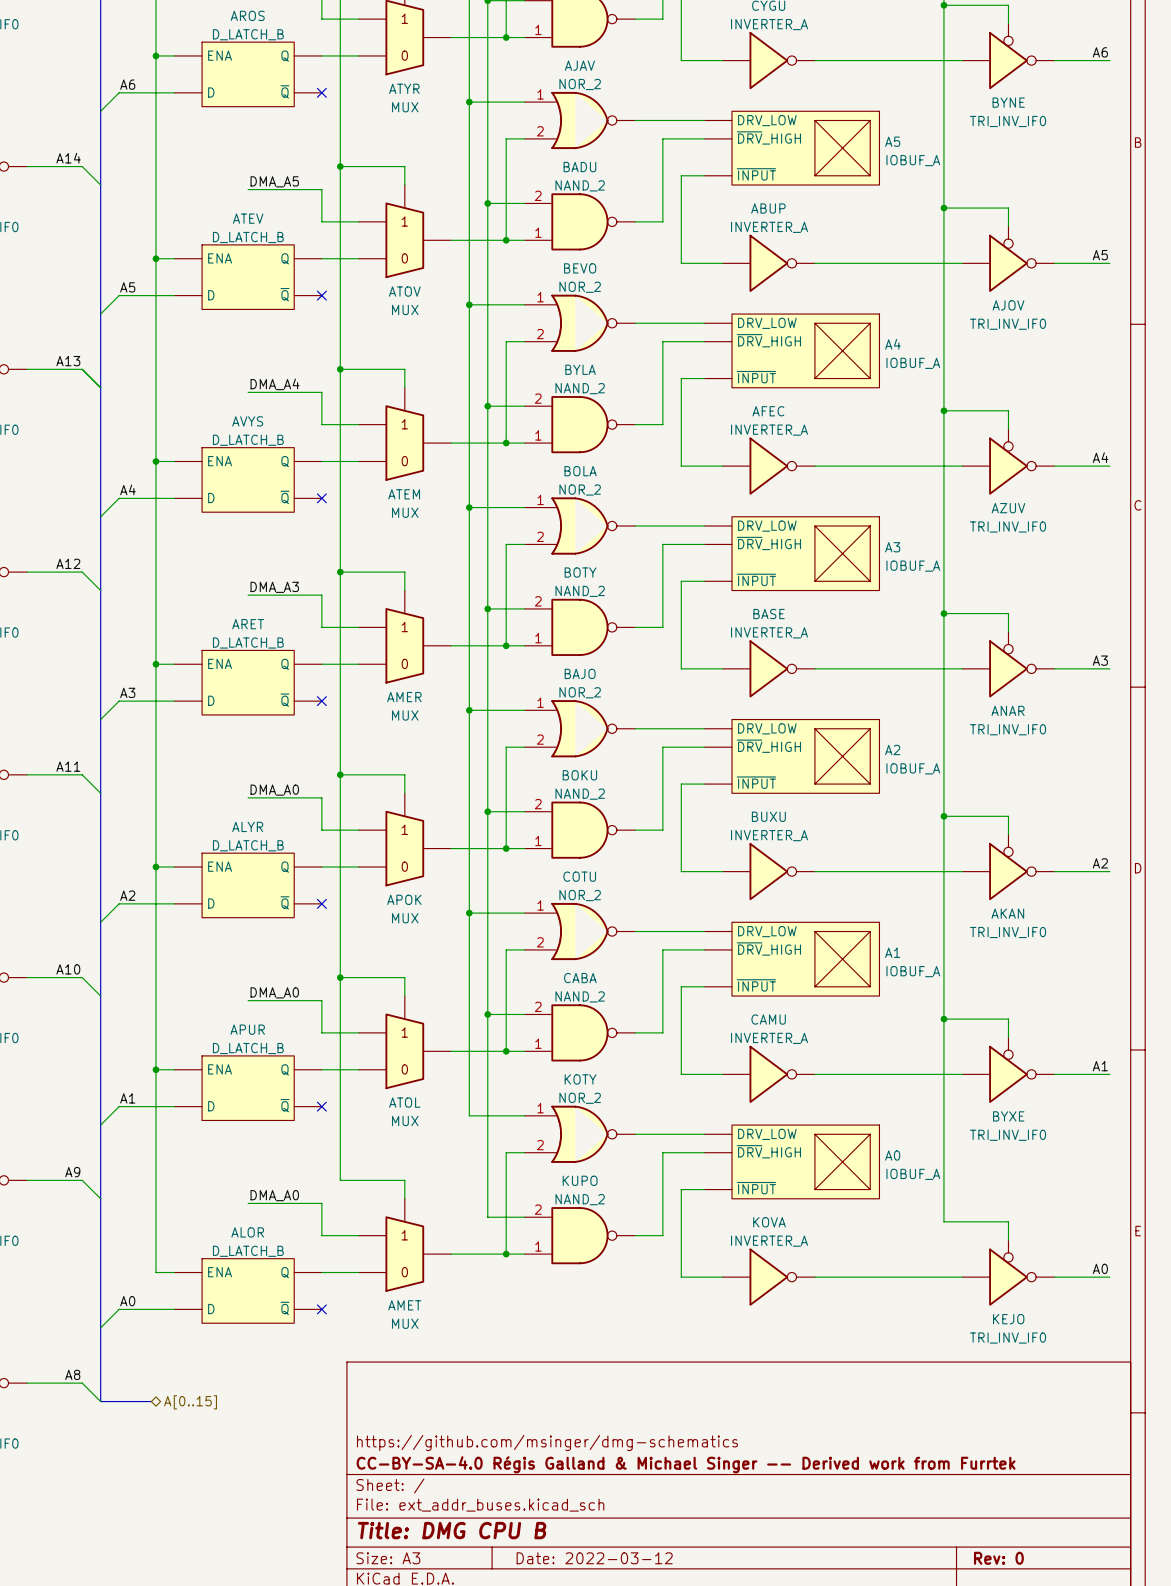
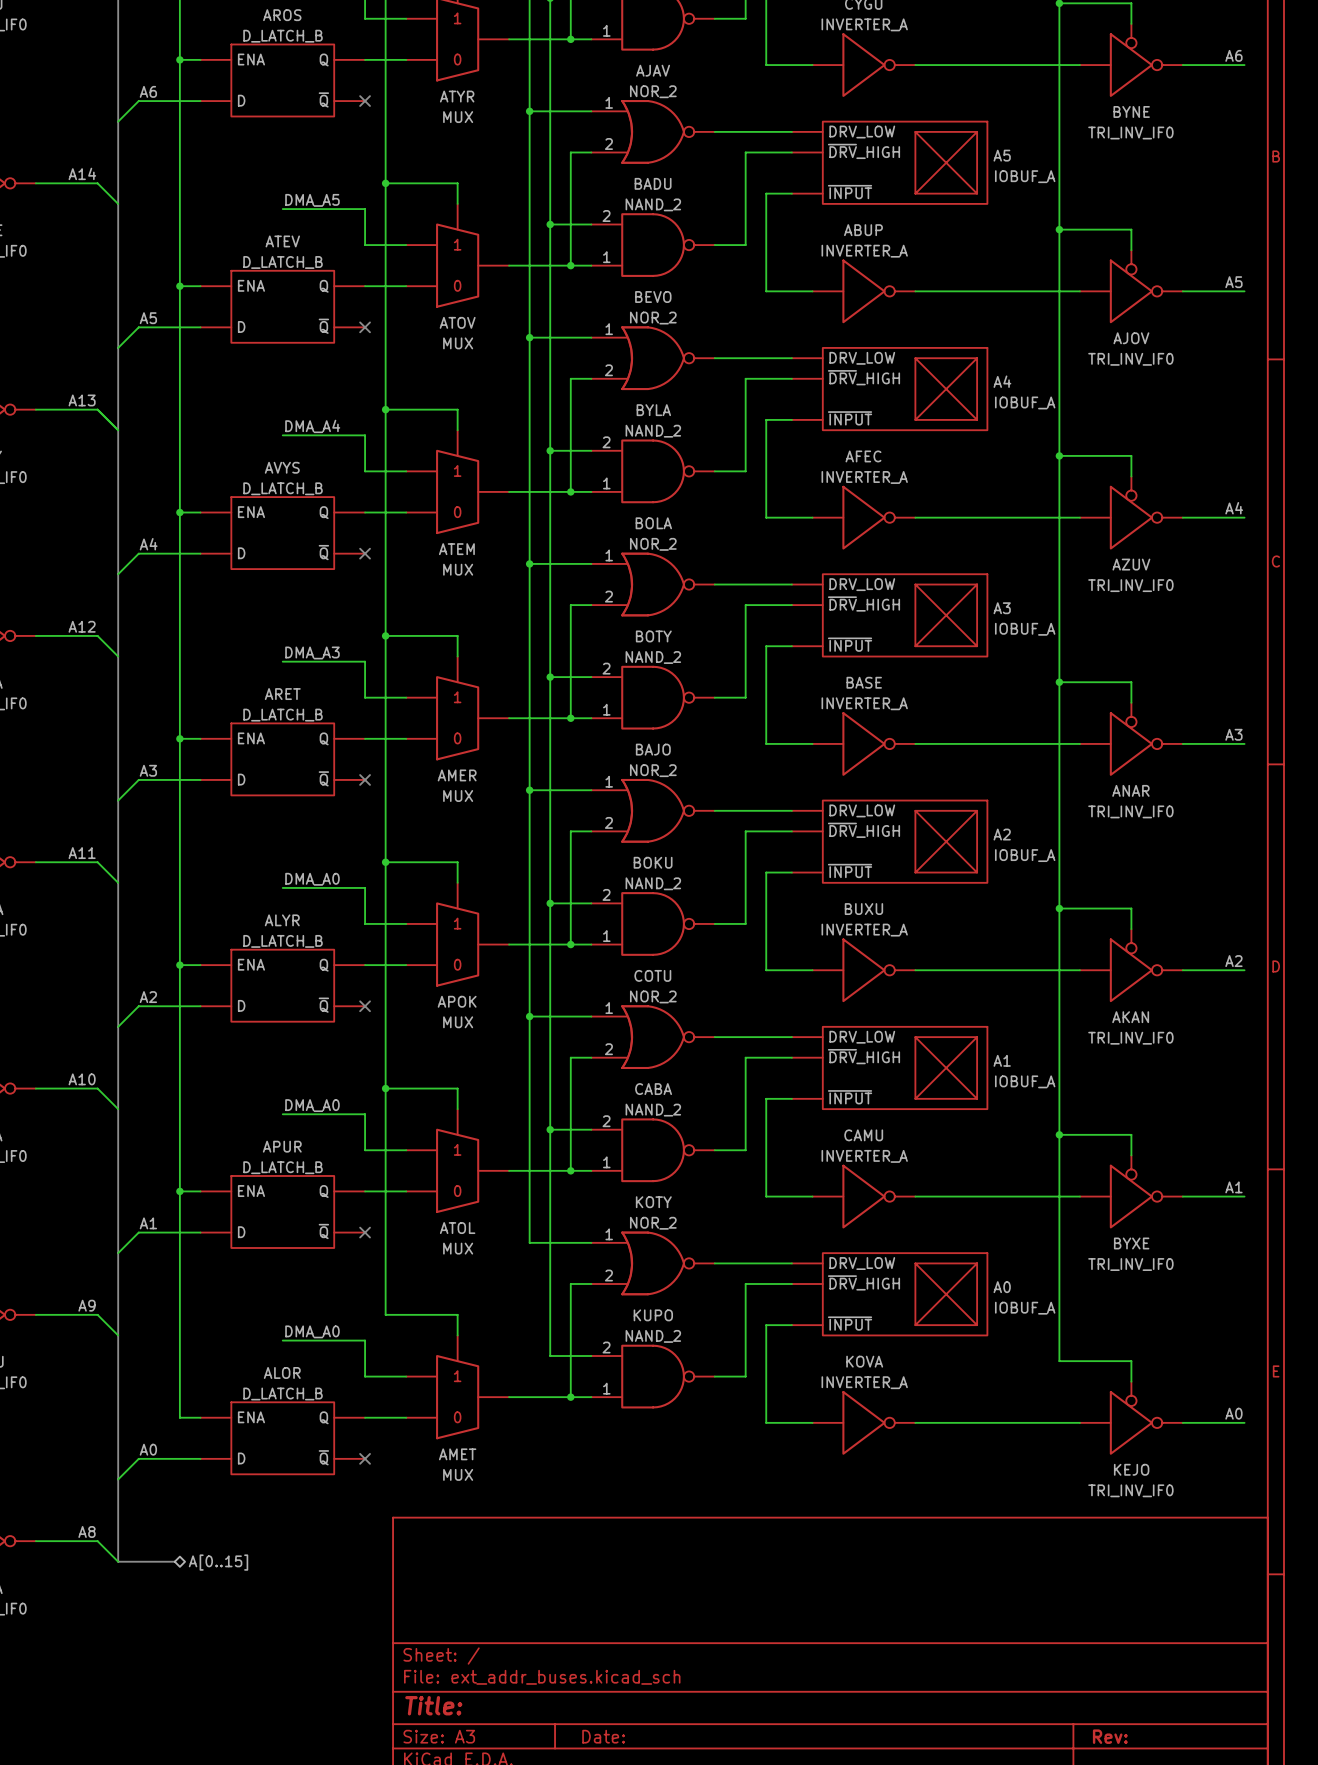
title block: https://github.com/msinger/dmg-schematics (547, 1443) -> none
title block: CC-BY-SA-4.0 Régis Galland & Michael Singer -- Derived work from Furrtek (686, 1464) -> none
title block: Title: DMG CPU B (452, 1530) -> Title: (433, 1705)
title block: Date: 2022-03-12 (594, 1558) -> Date: (603, 1736)
title block: Rev: 0 (998, 1558) -> Rev: (1110, 1736)

